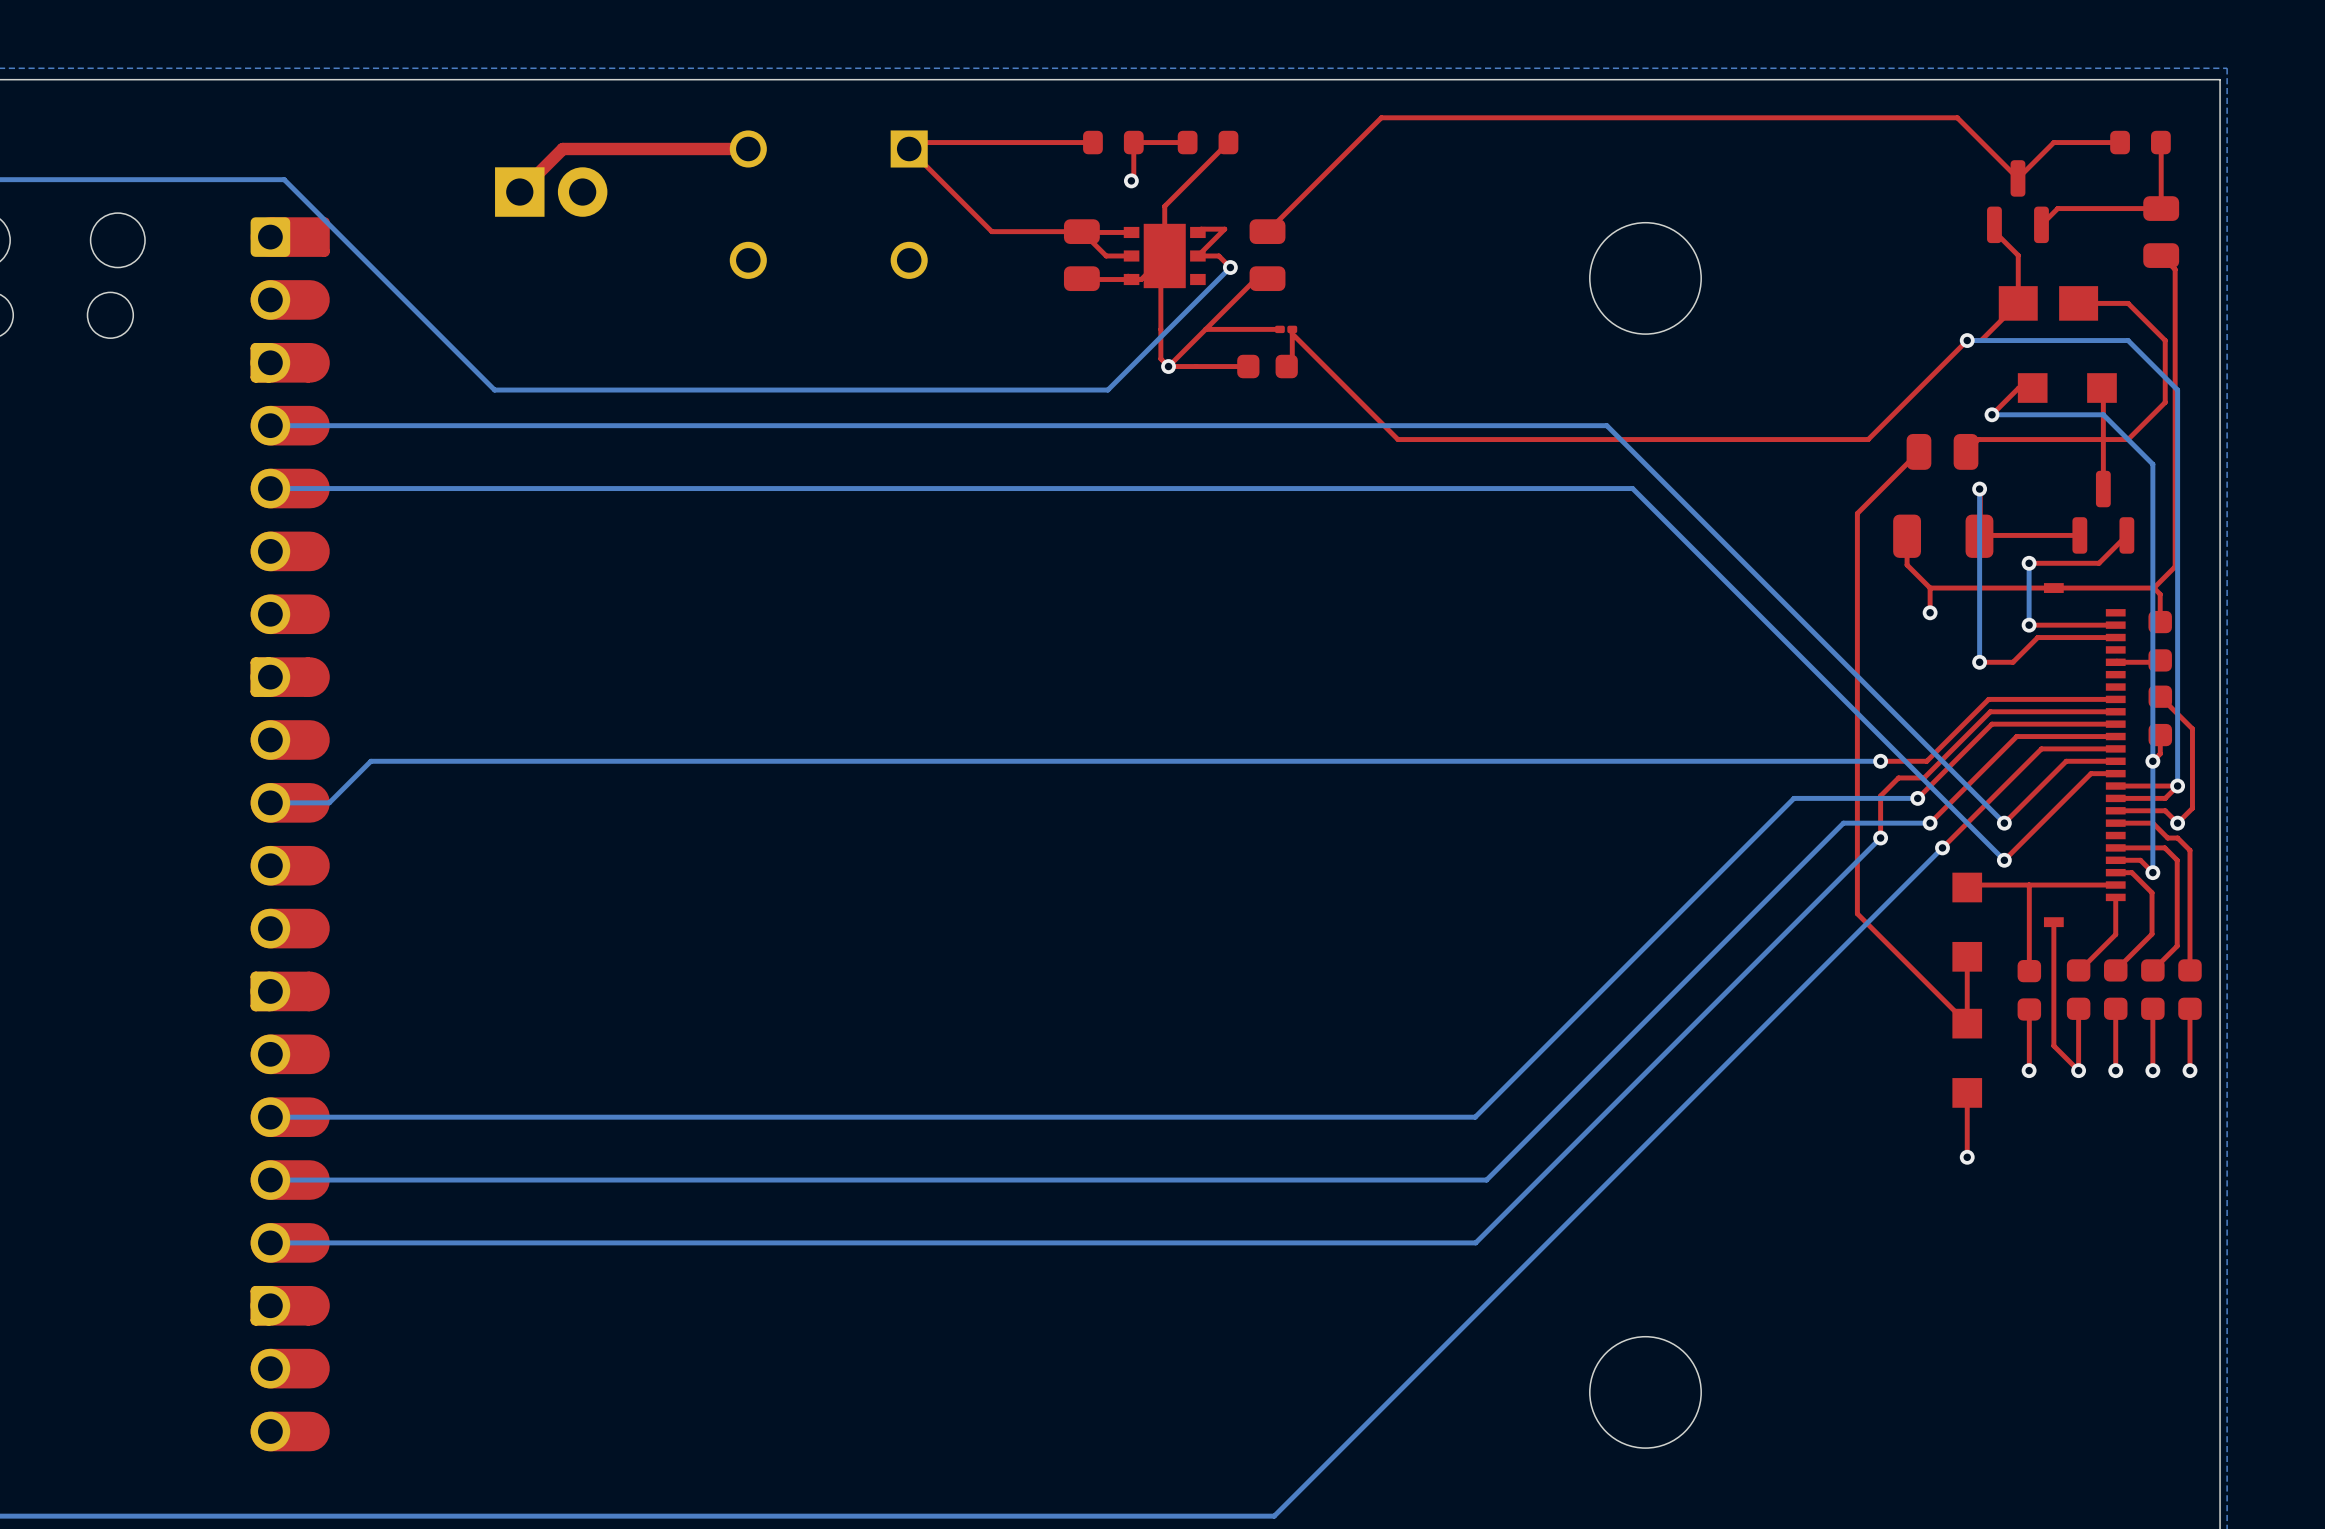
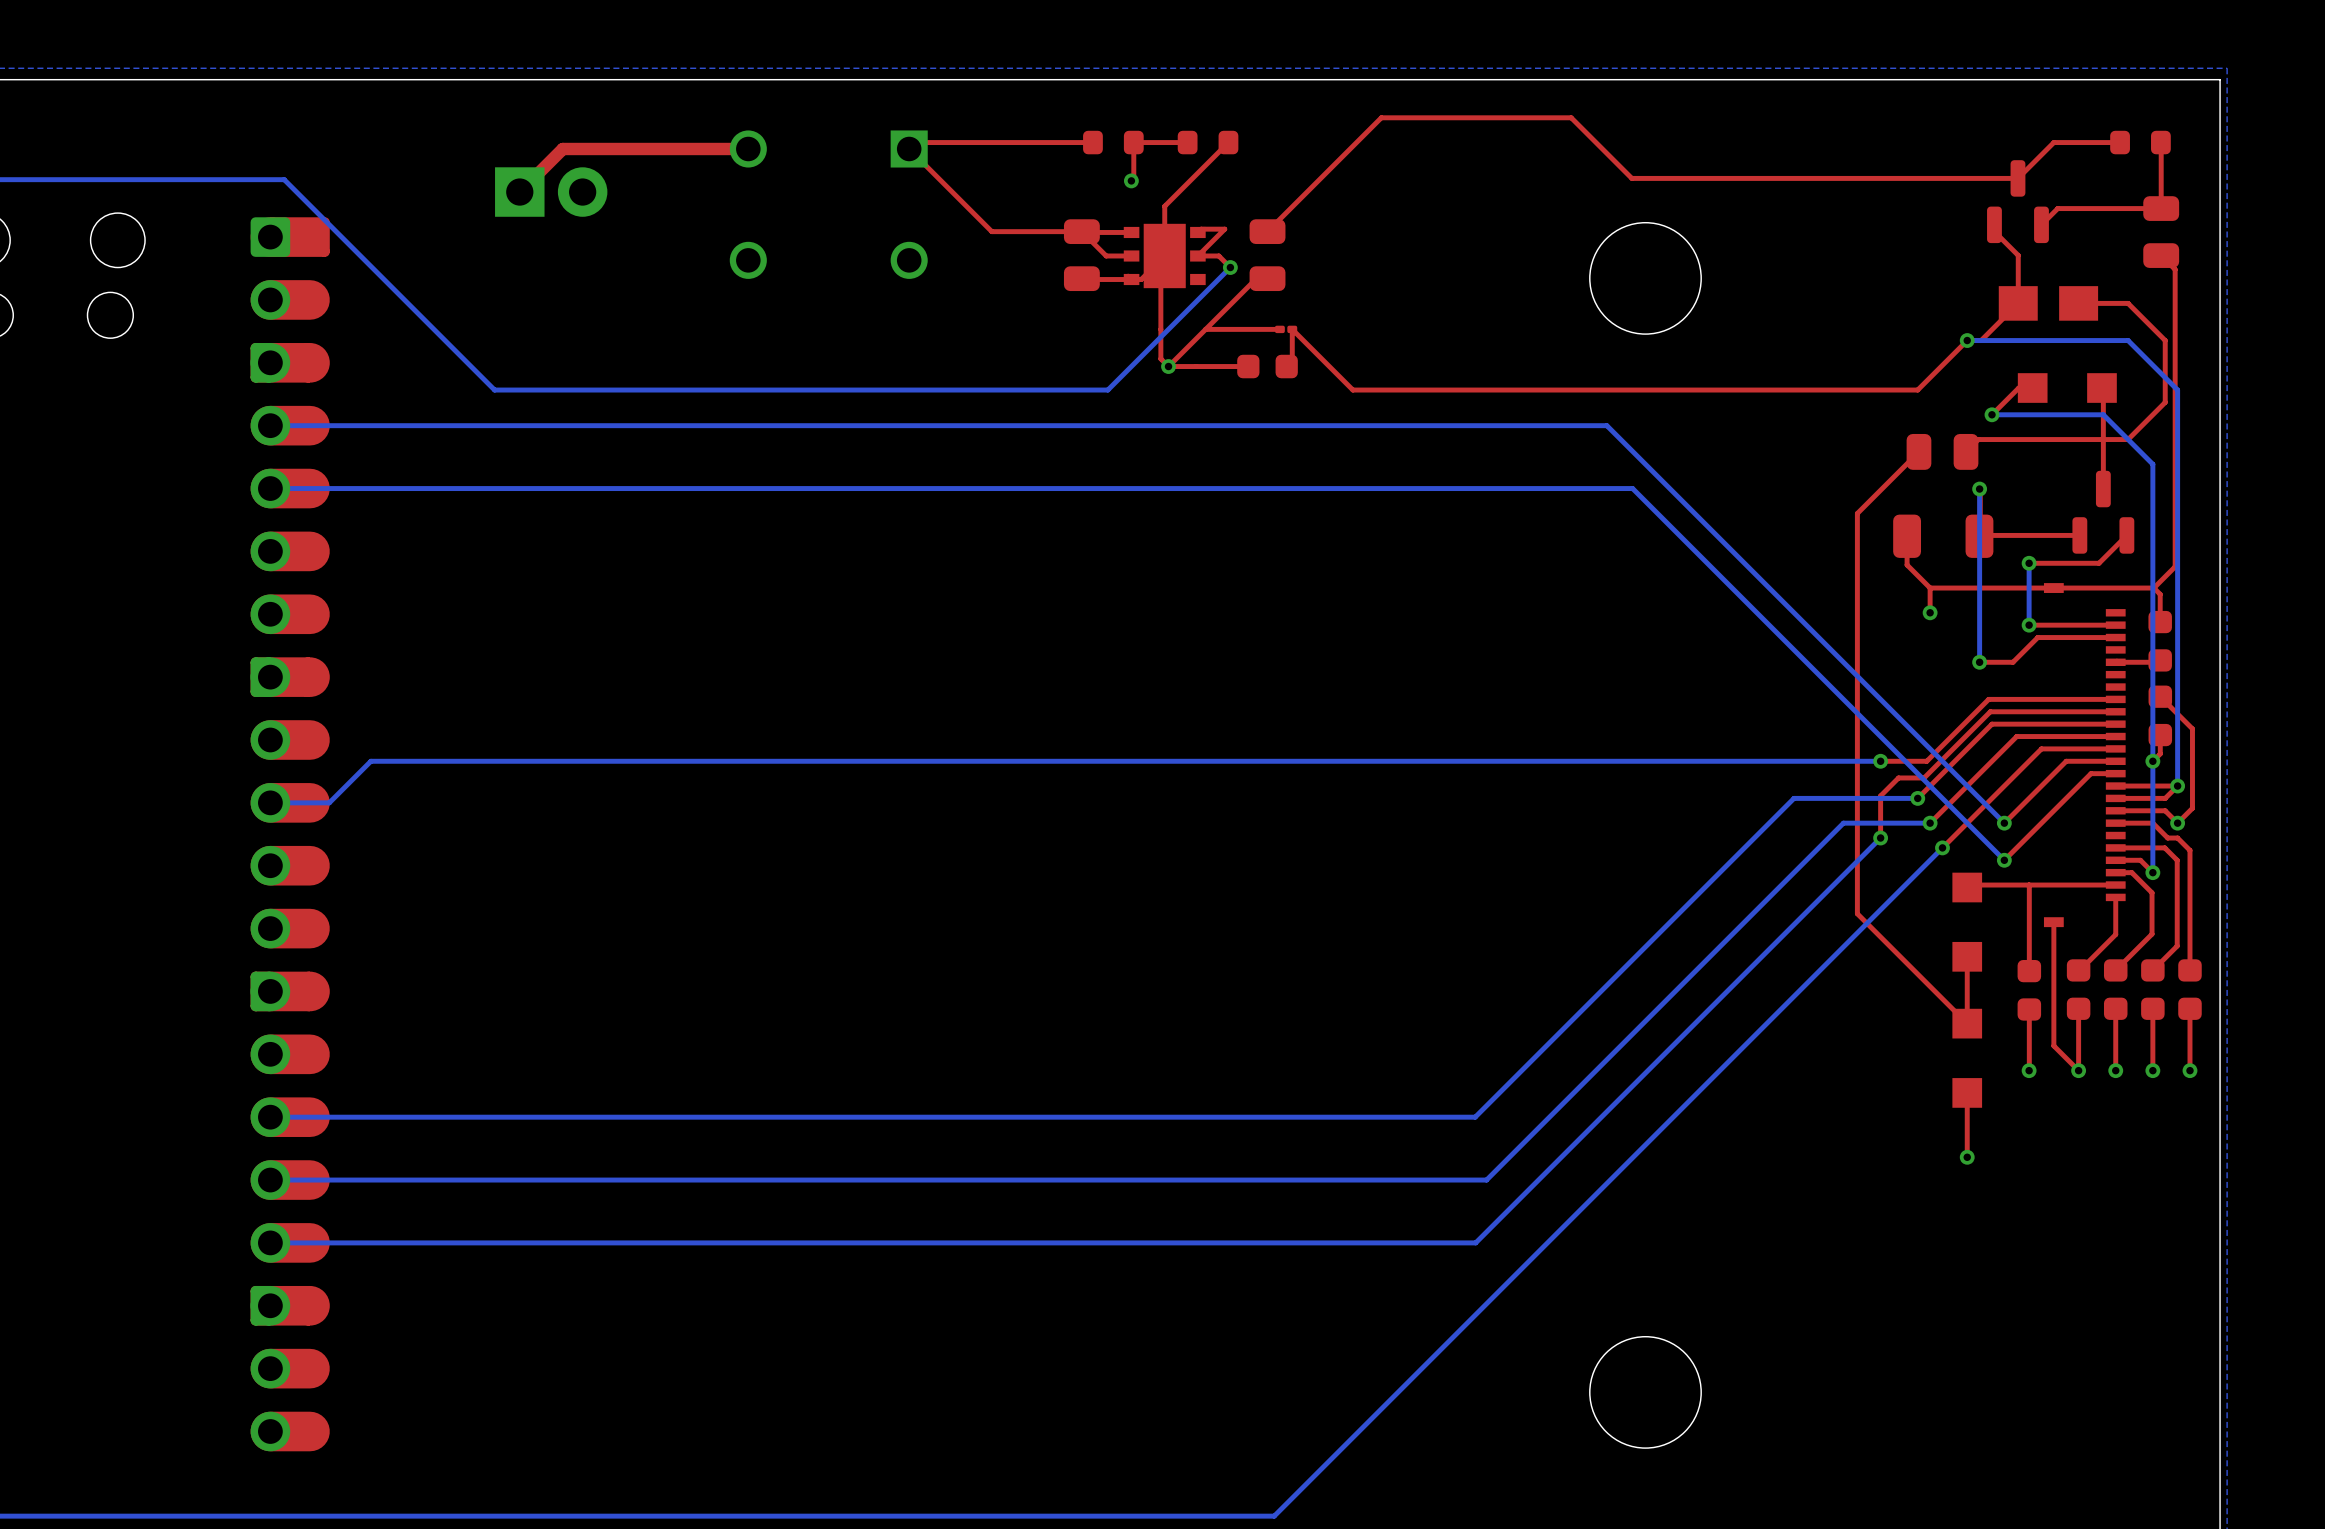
top track: (1571, 117) (1957, 117) (2017, 178) -> (1571, 117) (1631, 178) (2017, 178)
top track: (1292, 333) (1398, 439) (1868, 439) (1917, 390) -> (1292, 329) (1352, 390) (1917, 390)

